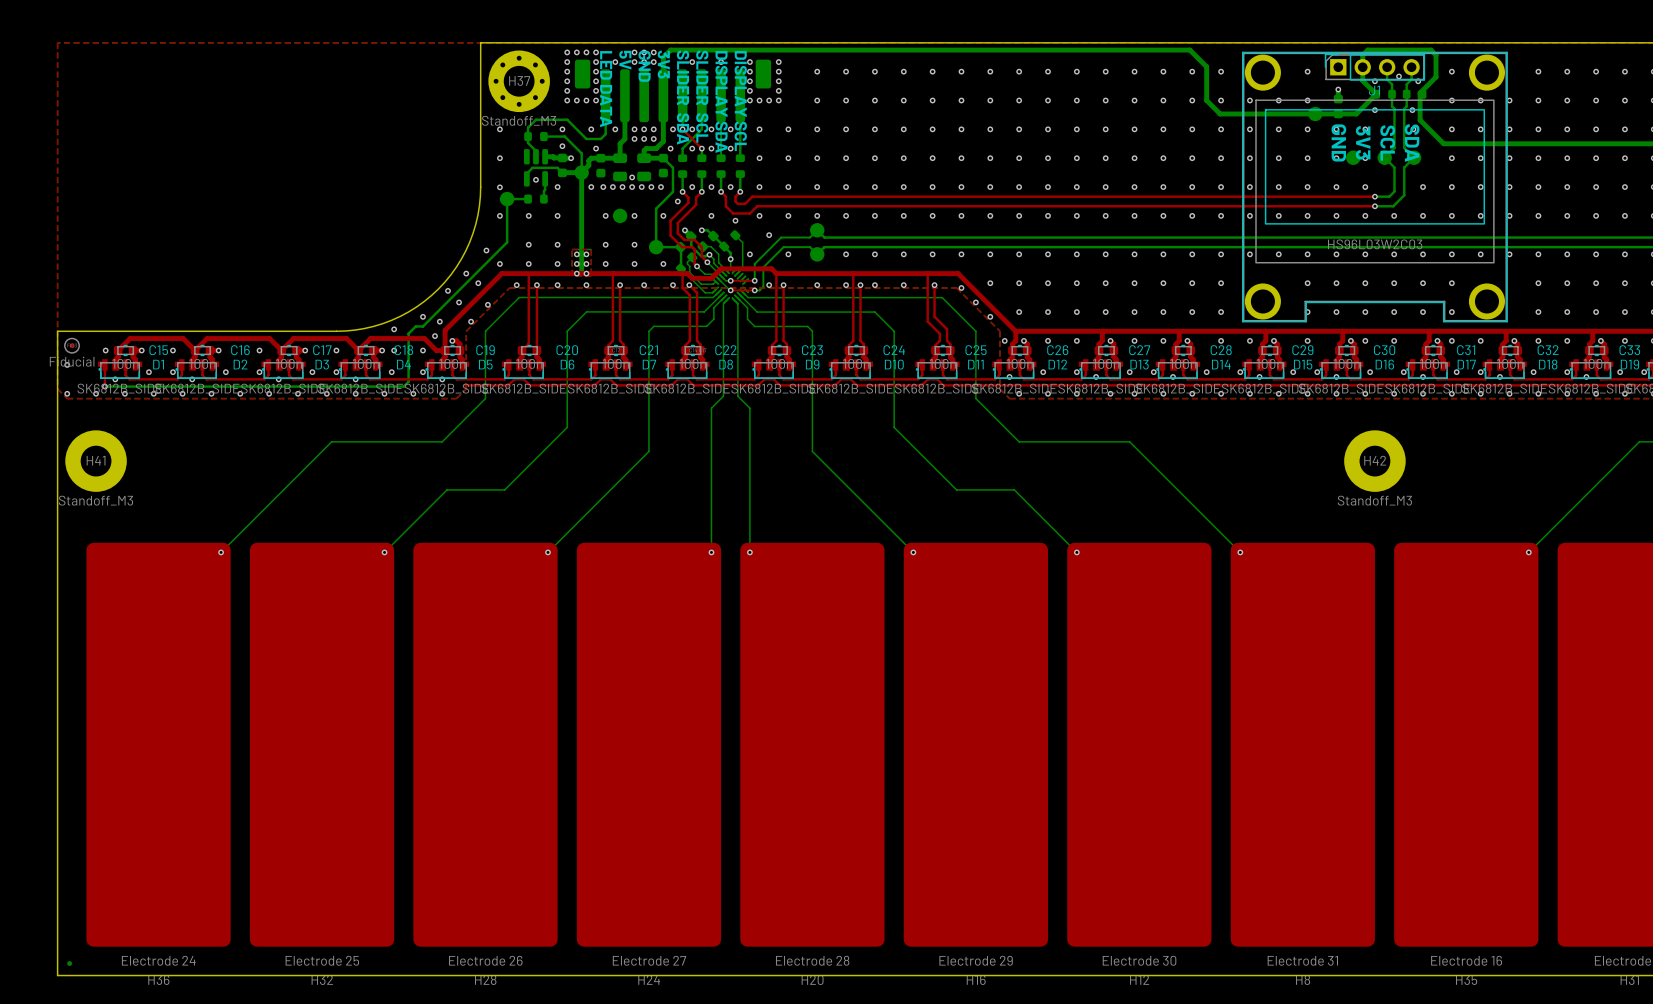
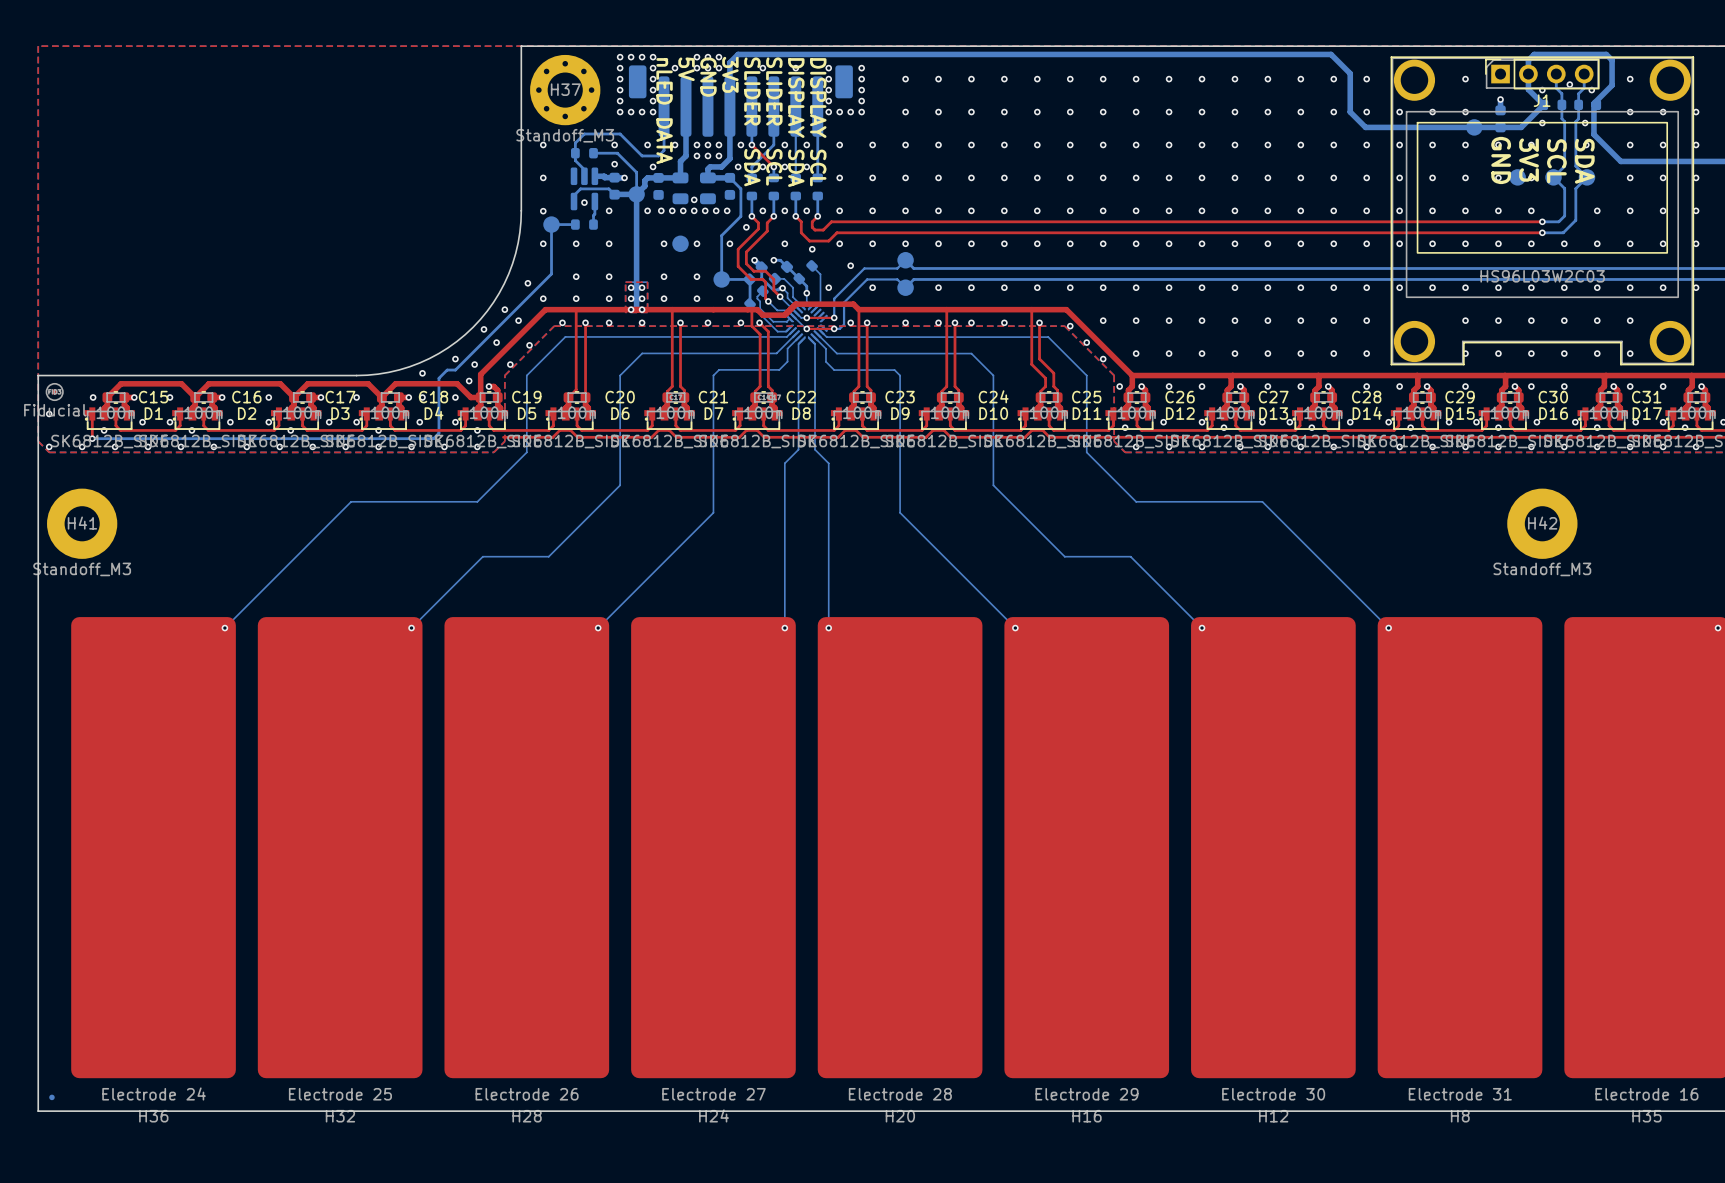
text: LED DATA (606, 89) -> nLED DATA (664, 111)

